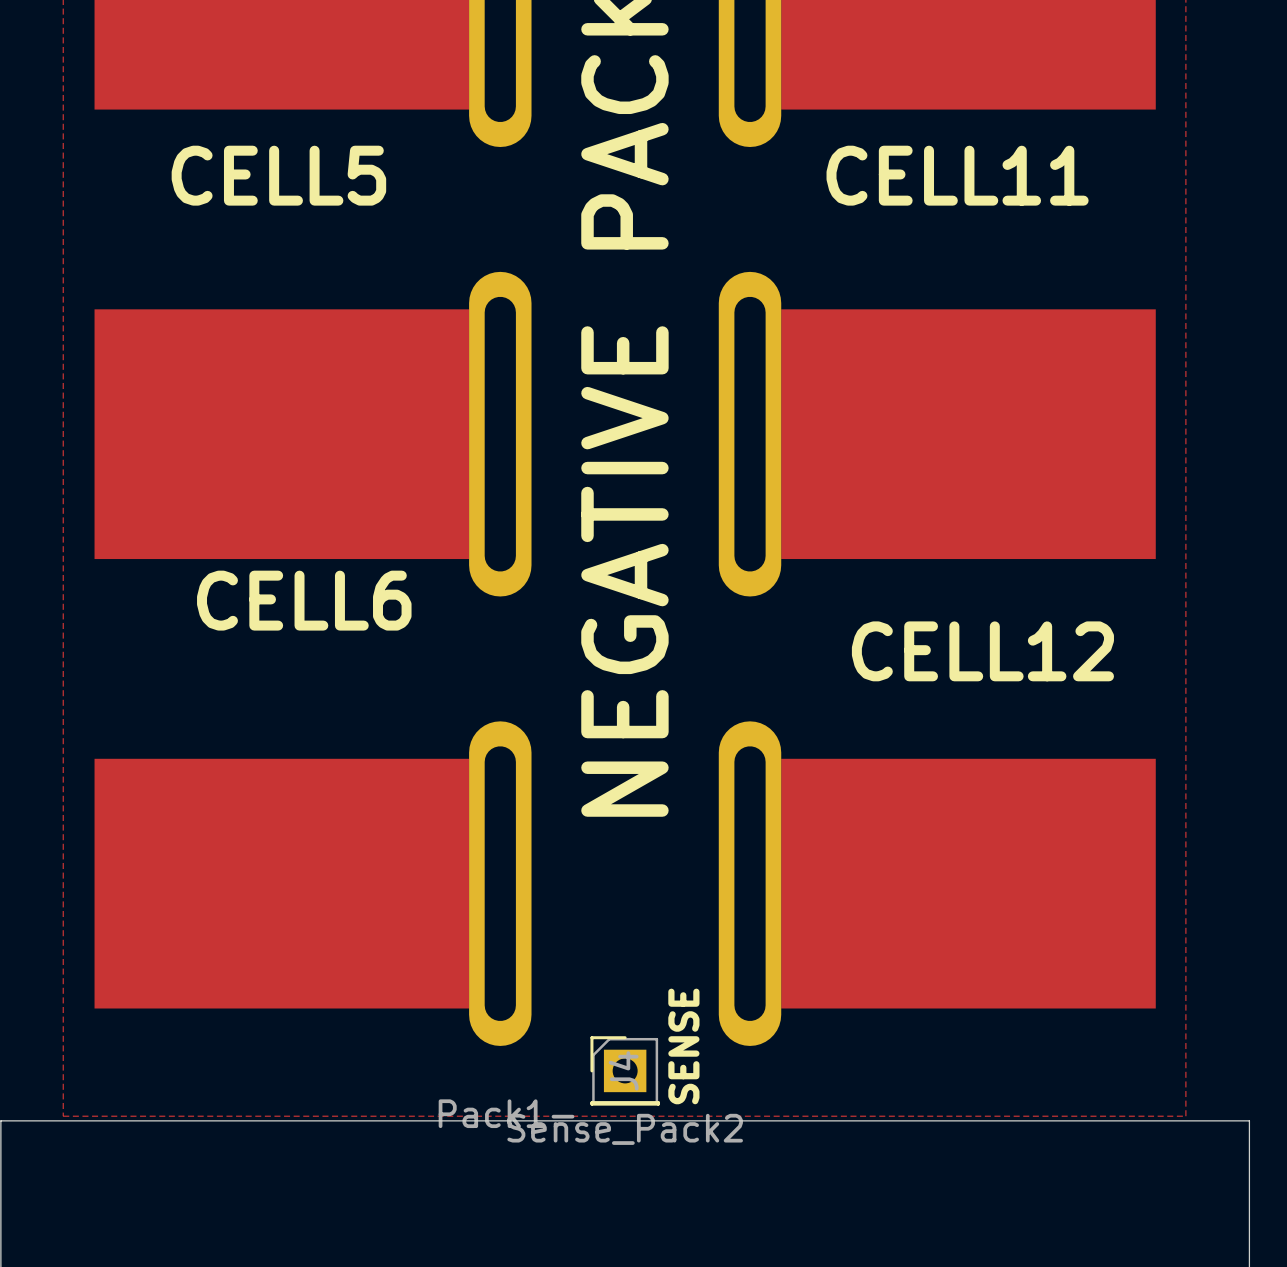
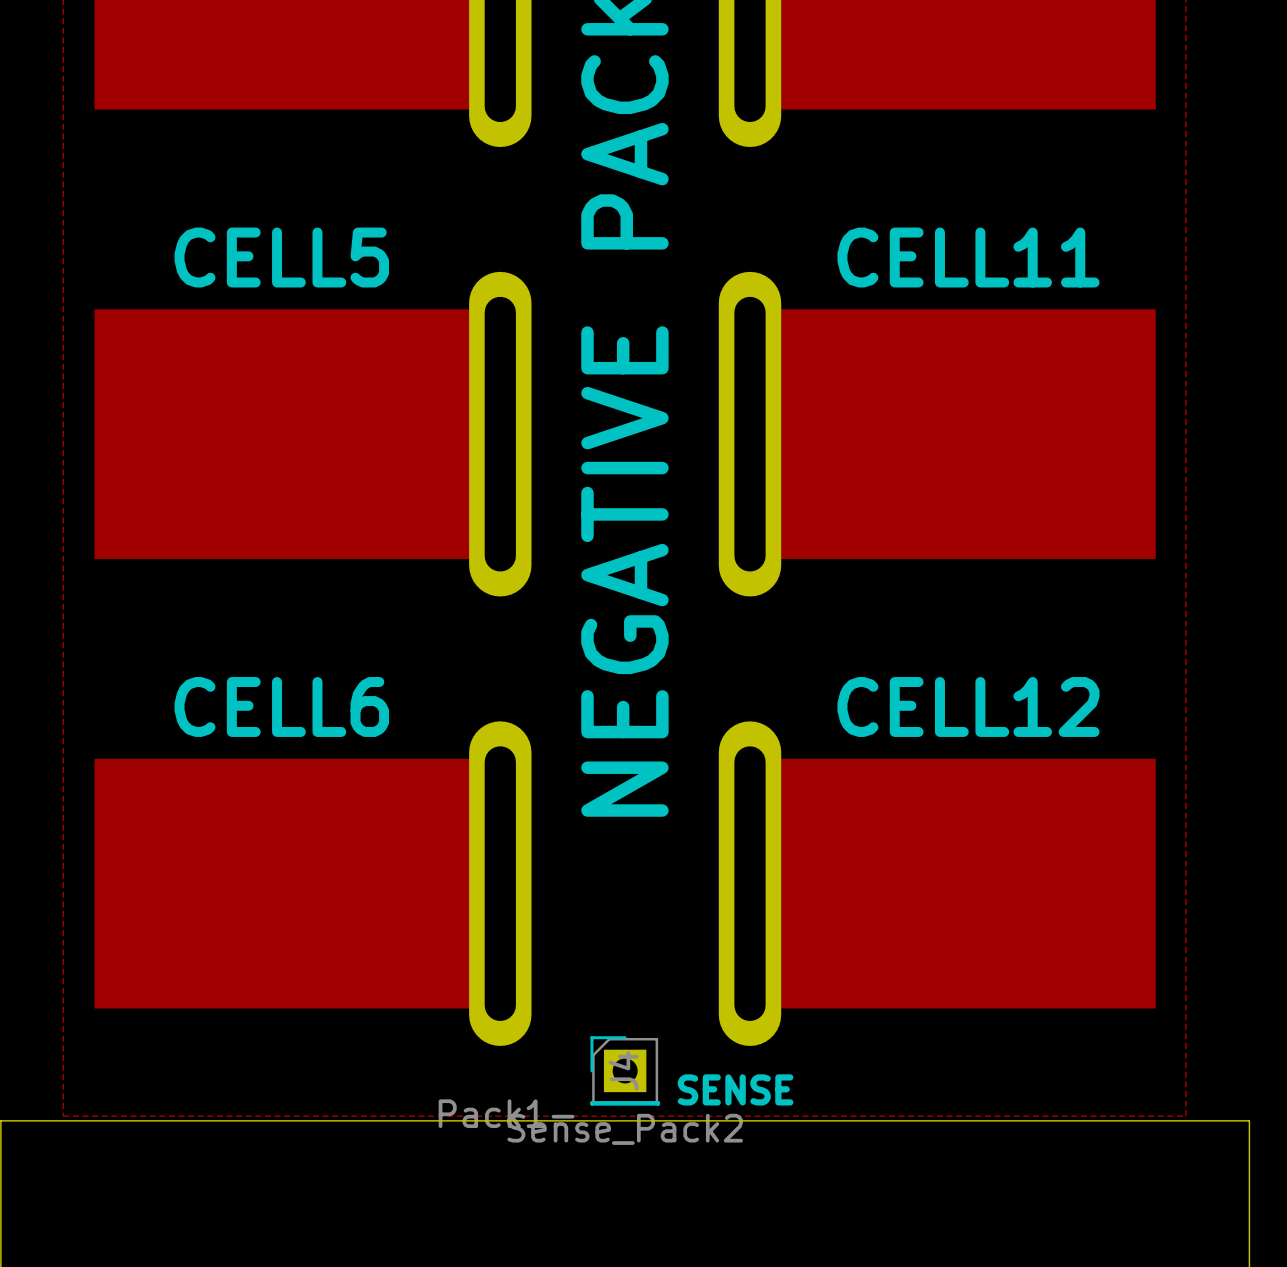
text position: CELL5 (278, 175) -> CELL5 (281, 257)
text position: CELL11 (957, 175) -> CELL11 (968, 257)
text position: CELL6 (304, 600) -> CELL6 (281, 706)
text position: CELL12 (982, 651) -> CELL12 (968, 706)
text rotation: 0° (683, 1046) -> 90° clockwise (735, 1089)

